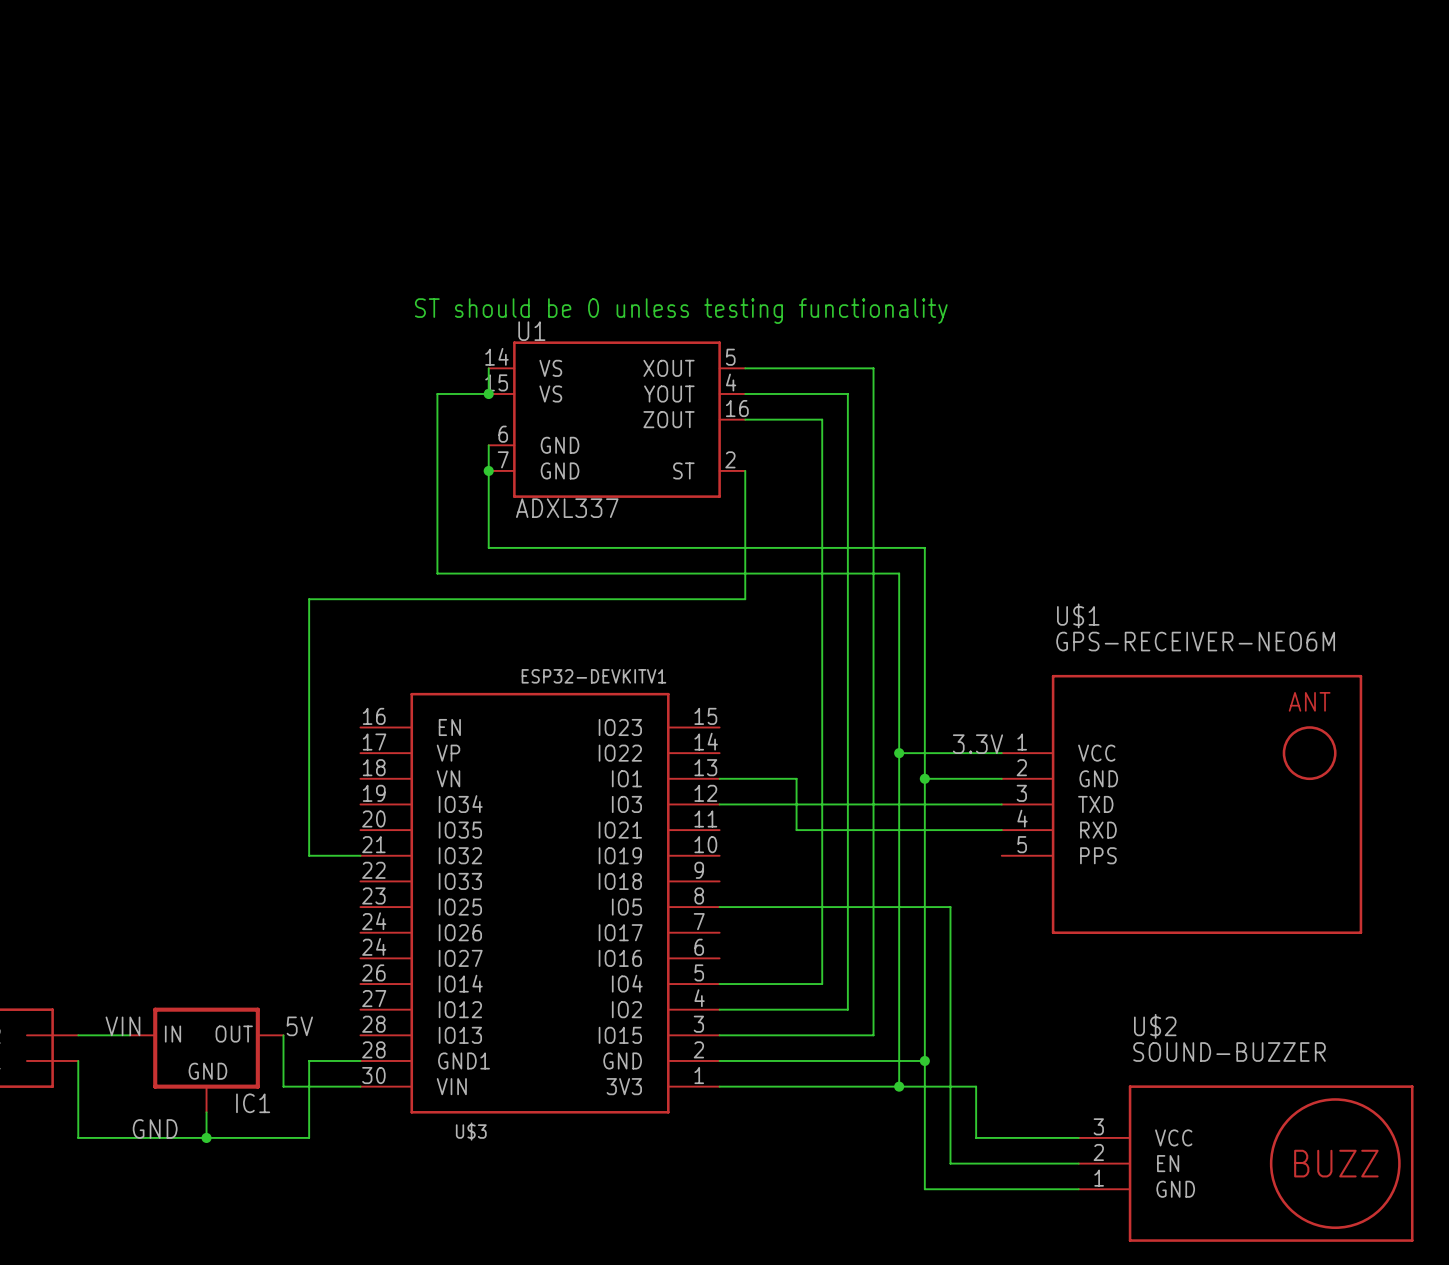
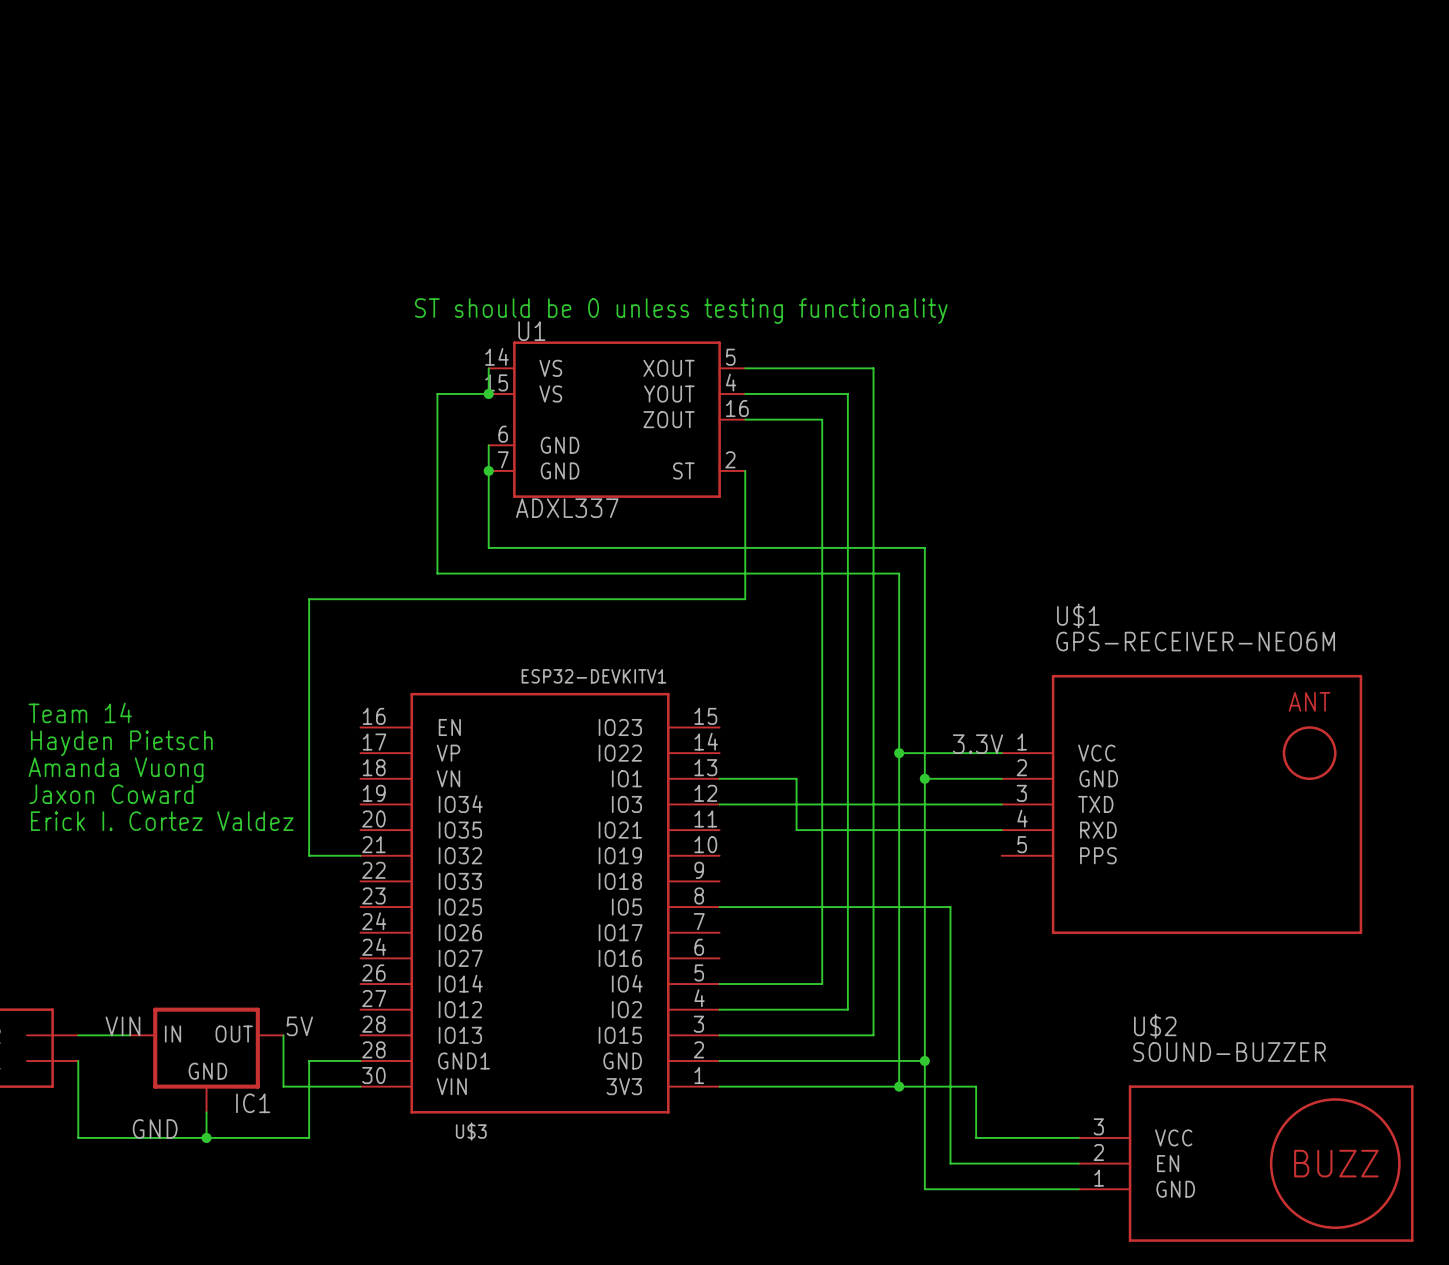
text: none -> Team 14 (80, 712)
text: none -> Hayden Pietsch (121, 743)
text: none -> Amanda Vuong (116, 770)
text: none -> Jaxon Coward (111, 794)
text: none -> Erick I. Cortez Valdez (162, 821)

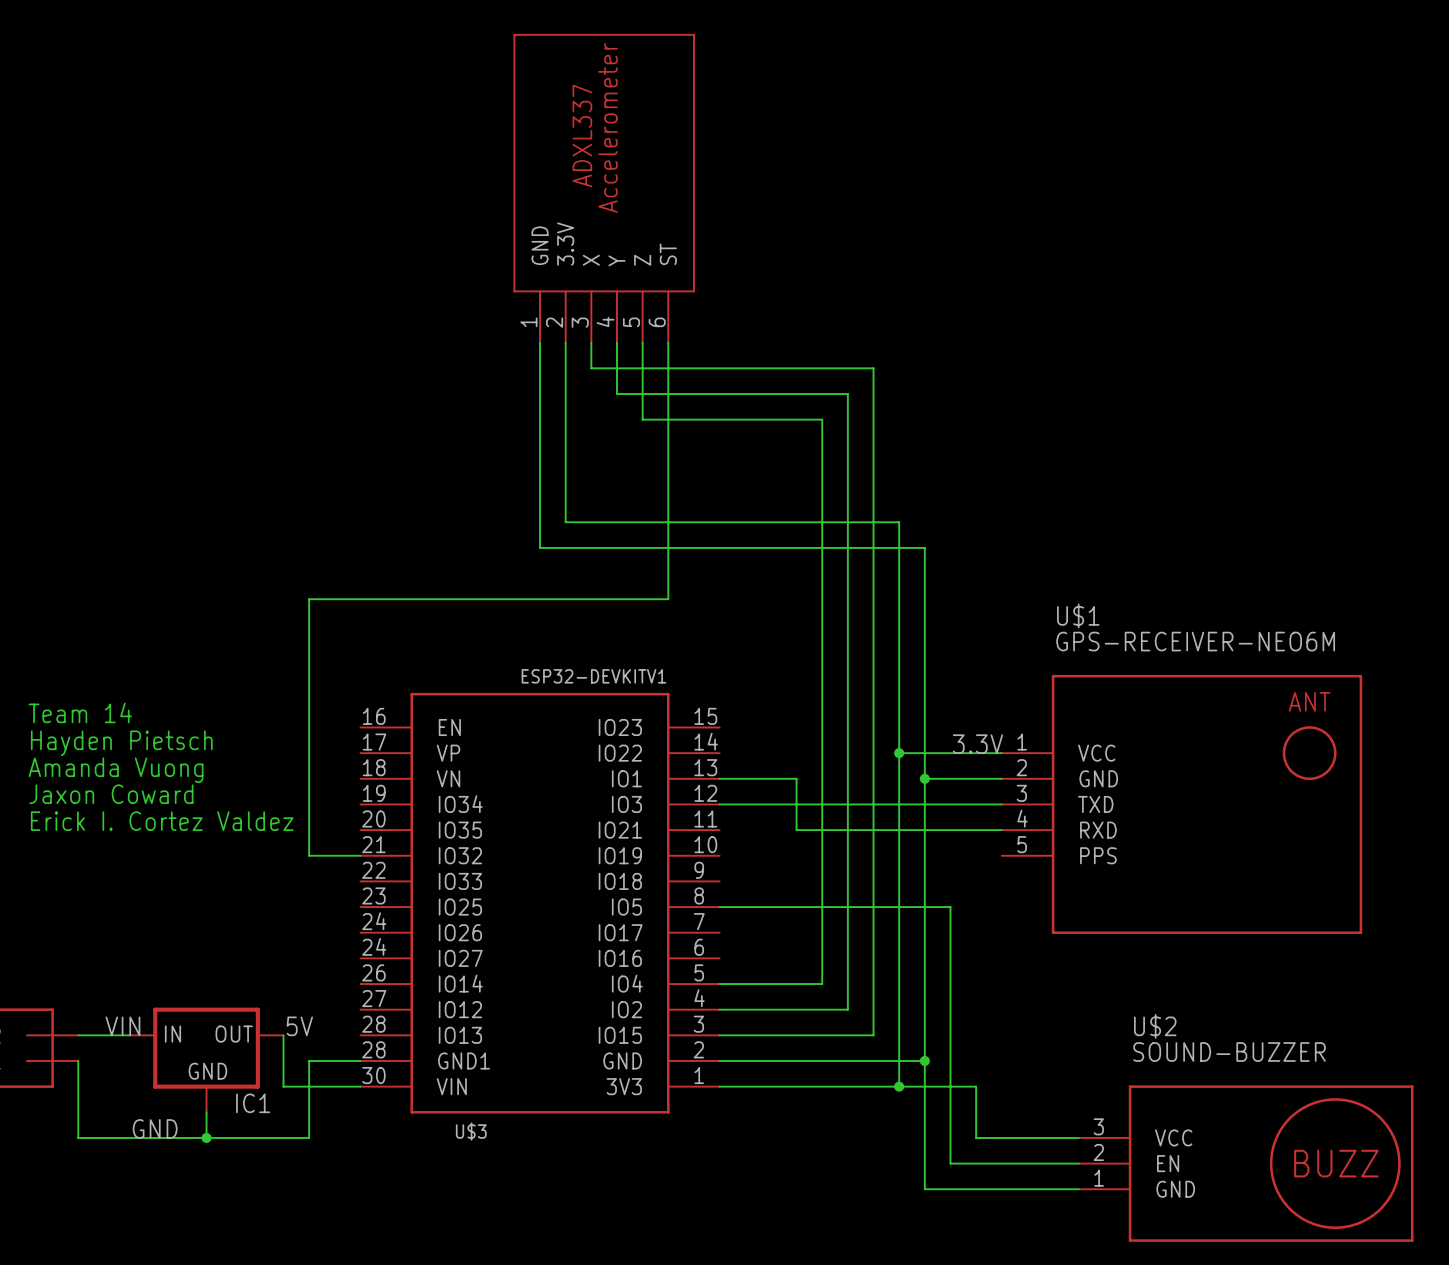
part: none -> (604, 188)
text: ST should be 0 unless testing functionality (681, 311) -> none
wire: none -> (591, 342) (591, 368) (745, 368)
wire: none -> (616, 342) (616, 393) (745, 393)
wire: none -> (642, 342) (642, 419) (745, 419)
wire: (488, 368) (488, 393) (437, 393) (437, 573) (899, 573) -> (565, 342) (565, 522) (899, 522) (899, 573)
junction: (488, 393) -> none
U1: ADXL337 (616, 419) -> none
wire: (488, 445) (488, 547) (540, 547) -> (540, 342) (540, 547)
junction: (488, 470) -> none
wire: (745, 470) (745, 599) (668, 599) -> (668, 342) (668, 599)

